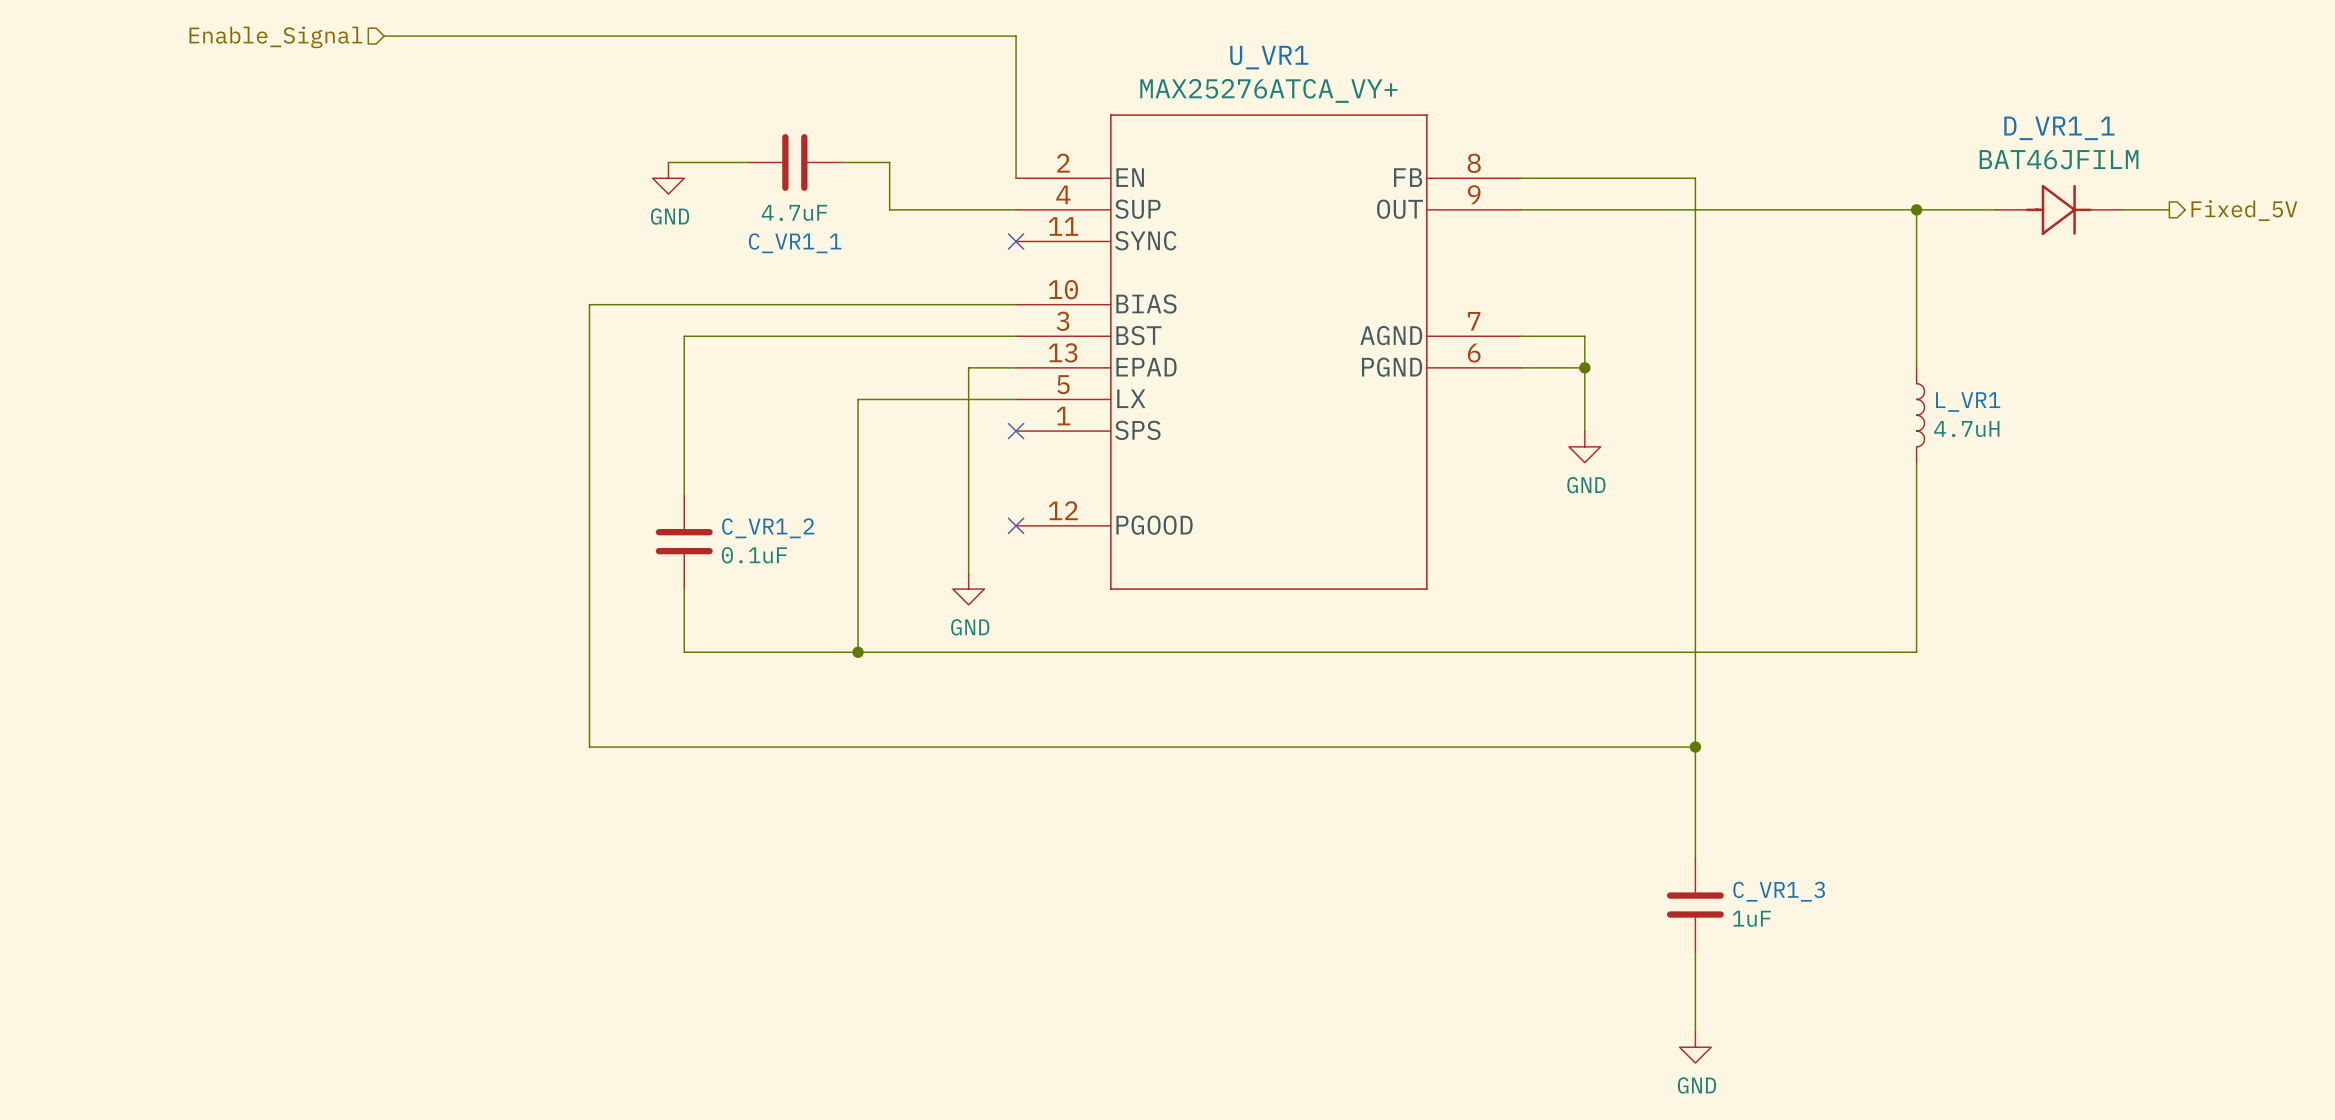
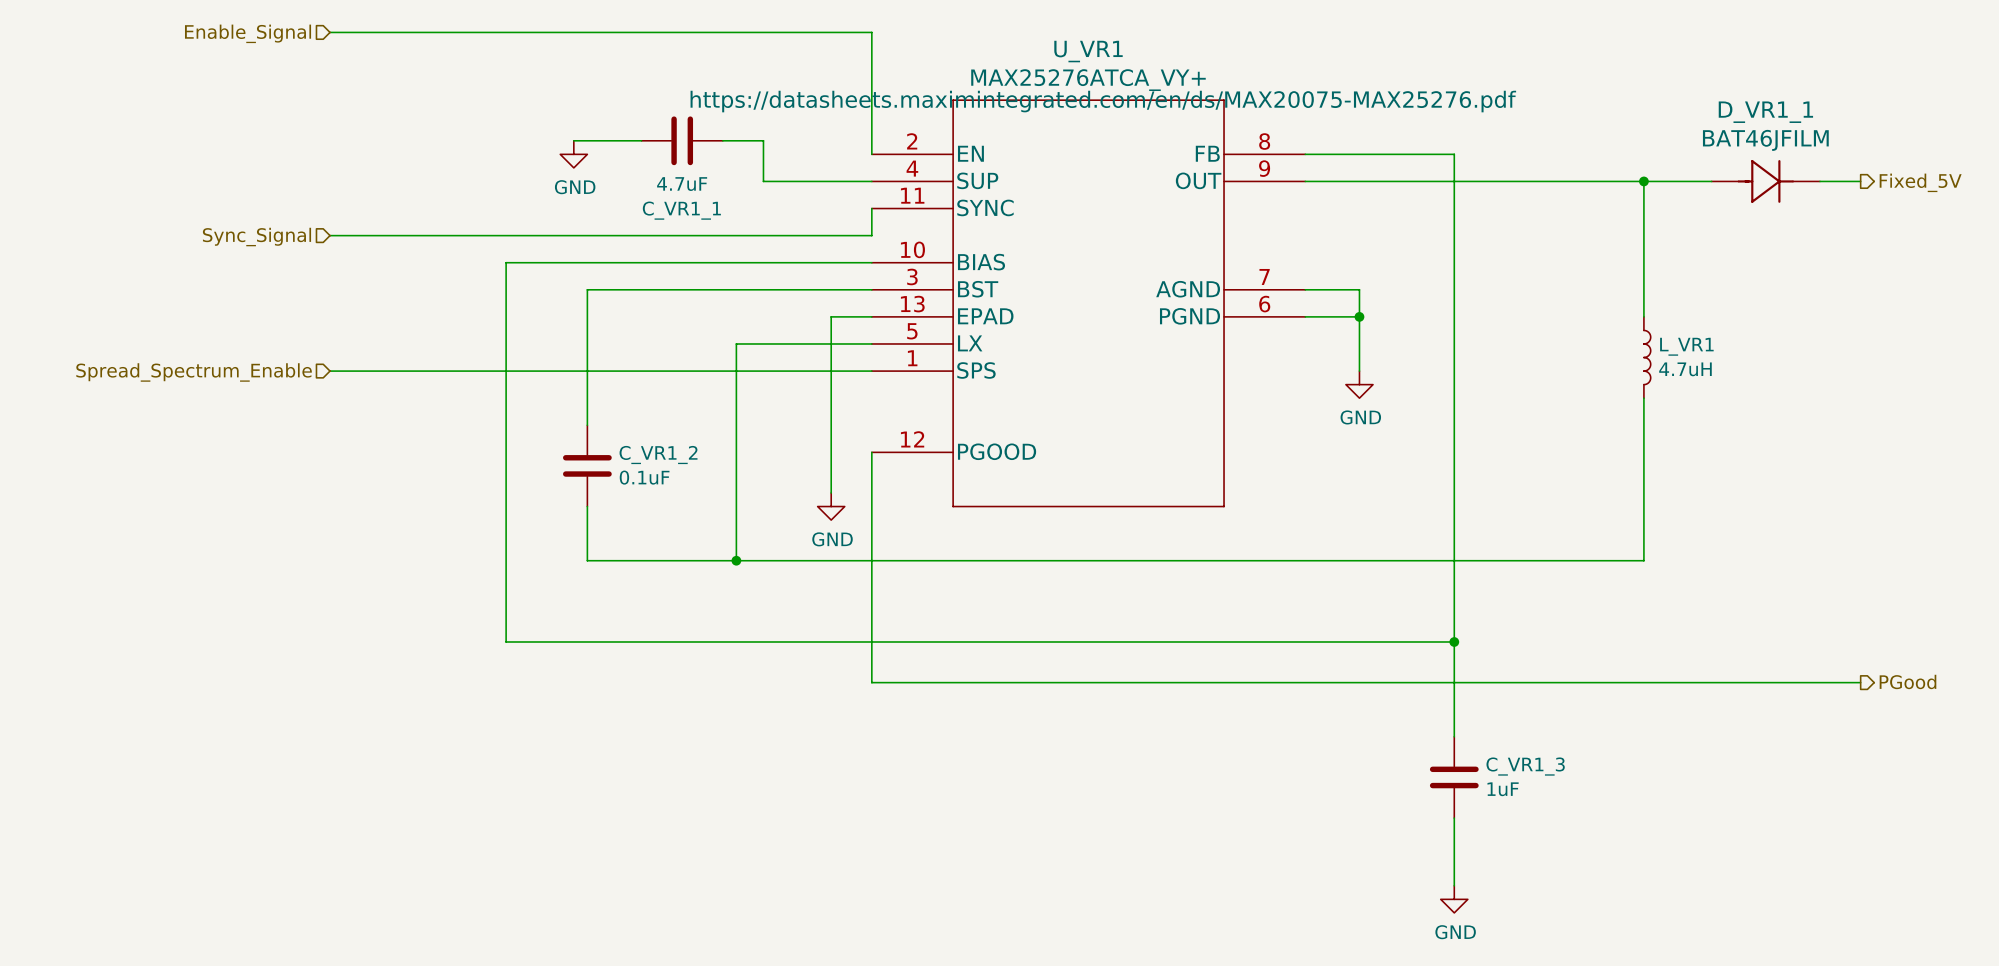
U_VR1 text: none -> https://datasheets.maximintegrated.com/en/ds/MAX20075-MAX25276.pdf (1103, 101)
wire: none -> (871, 208) (871, 235) (330, 235)
no-connect mark: (1016, 241) -> none
hierarchical label: none -> Sync_Signal (256, 237)
wire: none -> (330, 371) (871, 371)
no-connect mark: (1016, 431) -> none
hierarchical label: none -> Spread_Spectrum_Enable (194, 372)
wire: none -> (871, 452) (871, 682) (1860, 682)
no-connect mark: (1016, 525) -> none
hierarchical label: none -> PGood (1907, 681)

